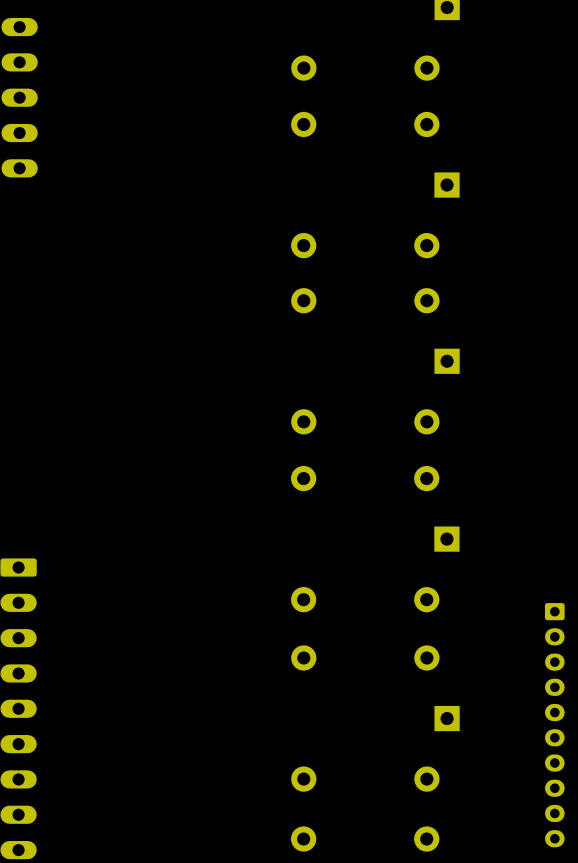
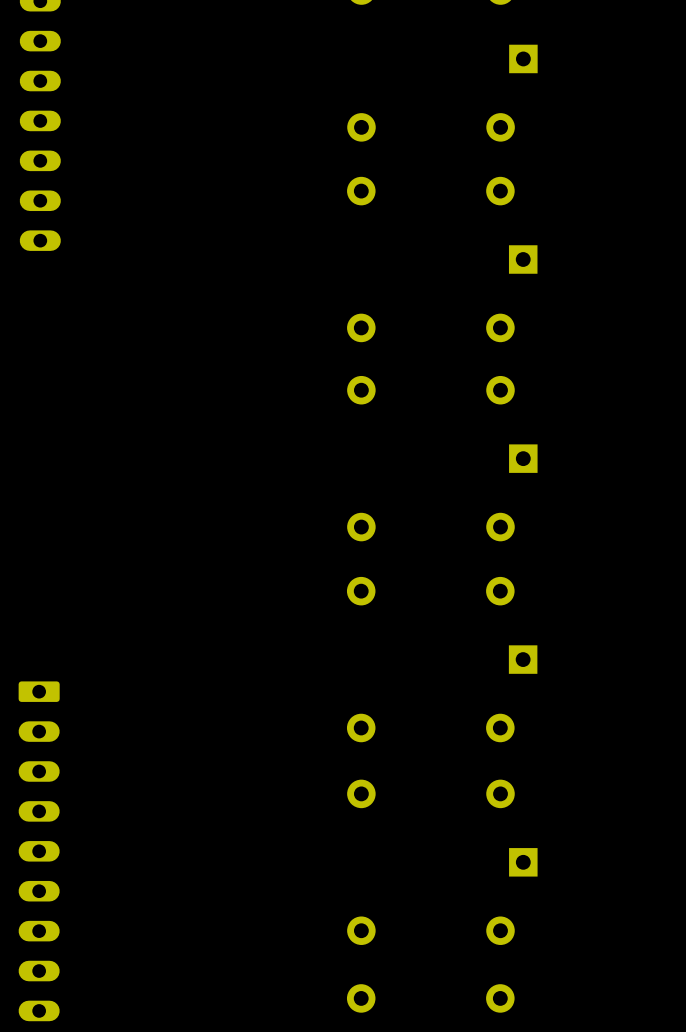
part: (554, 725) -> none

